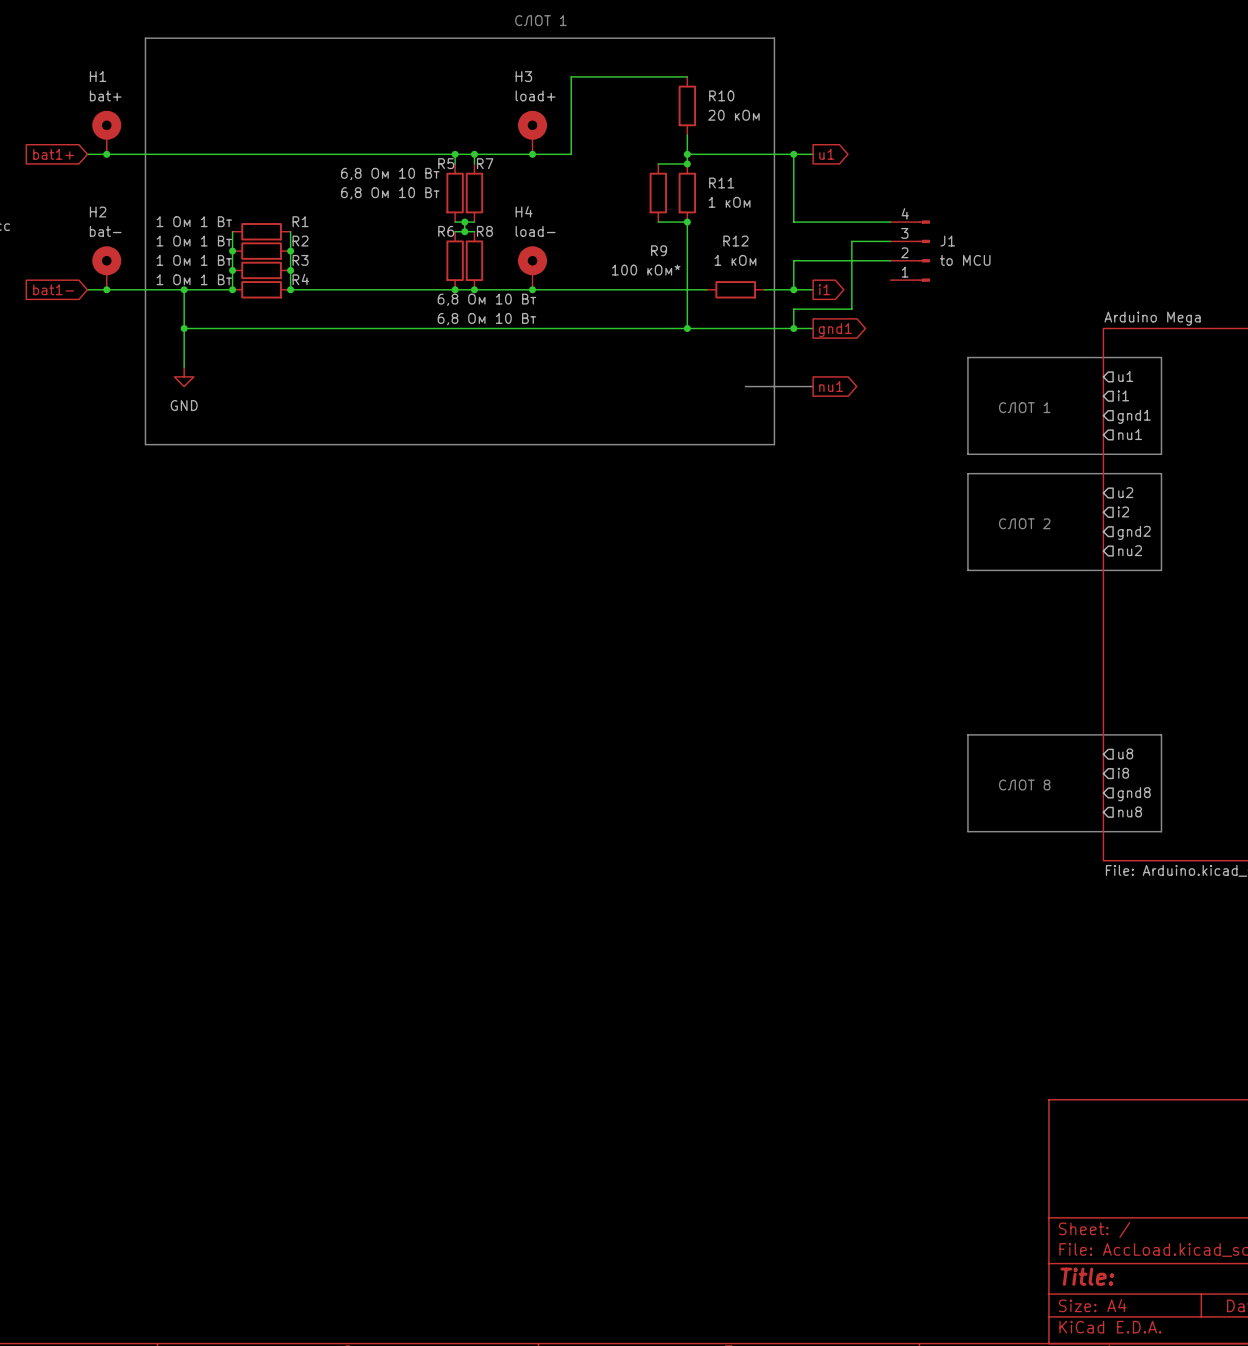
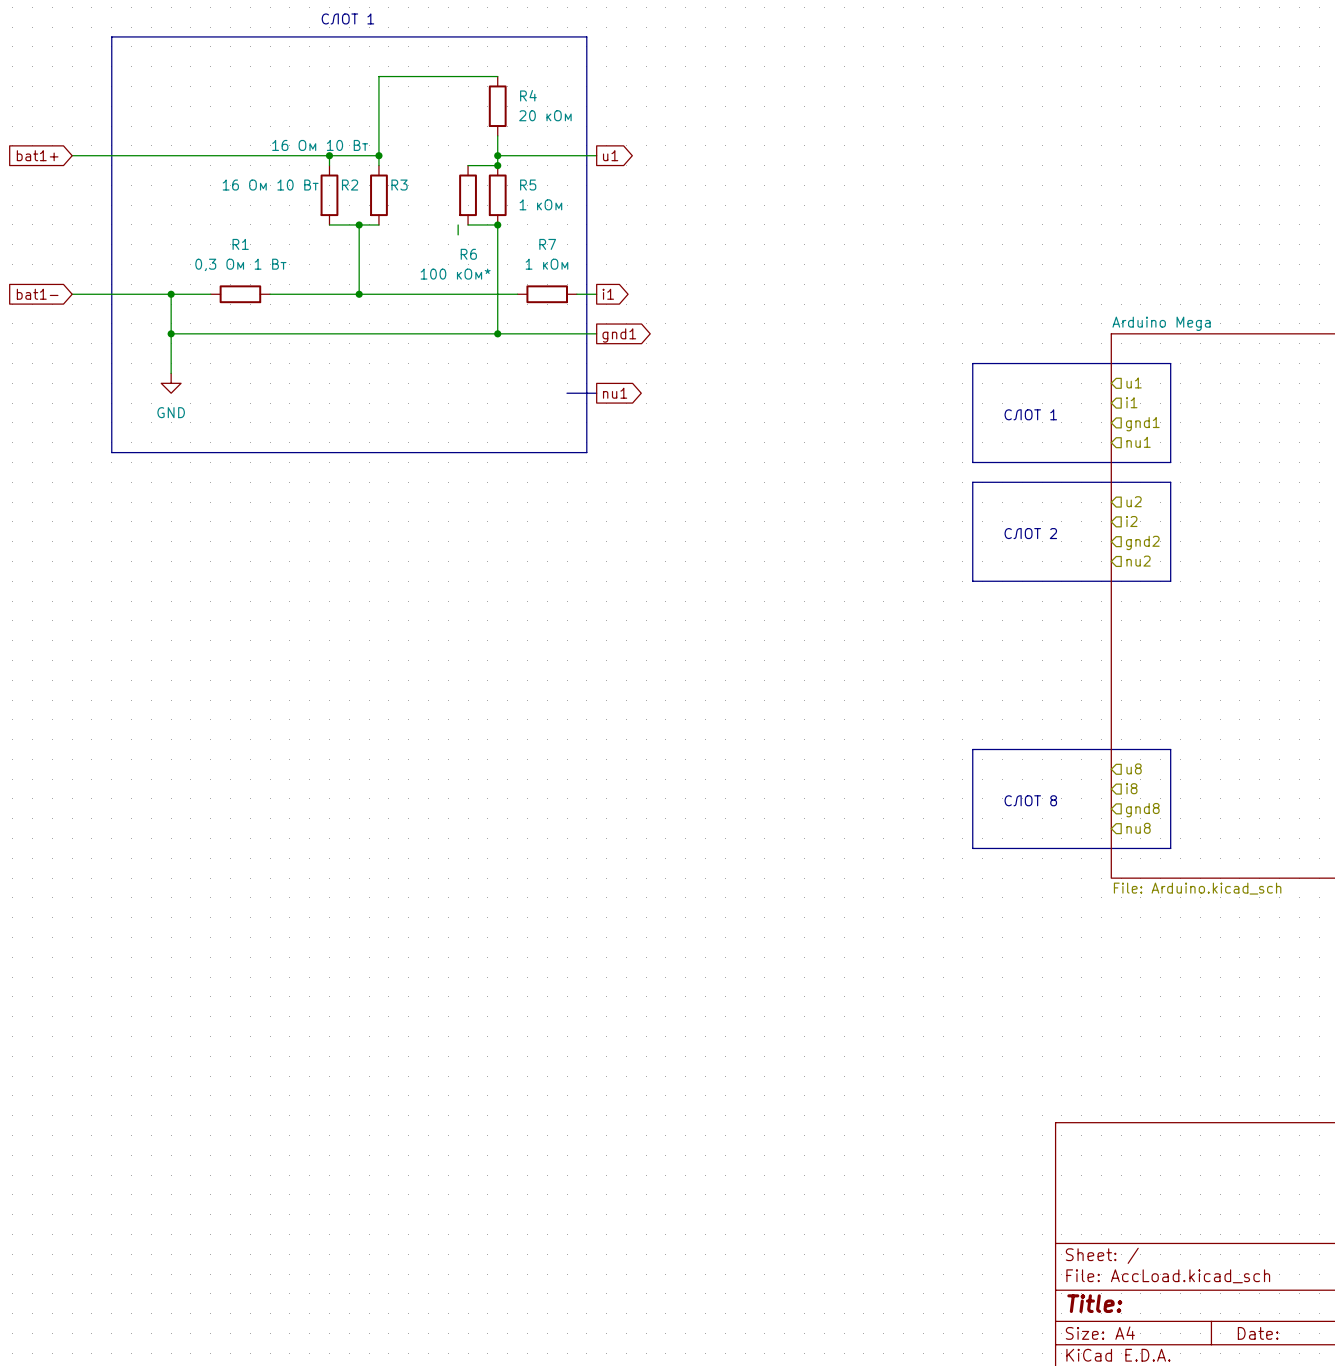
text position: СЛОТ 1 (540, 20) -> СЛОТ 1 (347, 18)
line: (145, 38) (145, 444) -> (131, 36) (111, 36) (111, 452) (131, 452)
line: (590, 38) (774, 38) (774, 444) (590, 444) -> (586, 36) (586, 452)
wire: none -> (497, 76) (378, 76) (378, 165)
wire: (687, 76) (571, 76) (571, 154) -> (596, 155) (567, 155)
R10: 20 кОм (687, 105) -> none
H1: bat+ (106, 132) -> none
H3: load+ (532, 132) -> none
wire: (687, 134) (687, 164) (658, 164) -> none
junction: (106, 154) -> none
junction: none -> (329, 155)
wire: (387, 154) (503, 154) -> none
junction: none -> (378, 155)
wire: (455, 154) (455, 164) -> (329, 155) (329, 165)
junction: (455, 154) -> none
wire: (474, 154) (474, 164) -> (497, 135) (497, 165) (468, 165)
junction: (474, 154) -> none
junction: none -> (497, 155)
junction: (532, 154) -> none
global label: none -> u1 (610, 155)
wire: (687, 154) (813, 154) -> none
junction: (687, 154) -> none
wire: (793, 154) (793, 222) (890, 222) -> none
junction: (793, 154) -> none
global label: u1 (826, 154) -> none
R5 name position: R5 (446, 163) -> R5 (528, 185)
R7 name: R7 (485, 163) -> R6 (468, 254)
junction: none -> (497, 165)
junction: (687, 164) -> none
R5 value: 6,8 Ом 10 Вт (390, 174) -> 1 кОм (540, 204)
R7 value: 6,8 Ом 10 Вт (390, 193) -> 100 кОм* (455, 274)
R5 position: (455, 193) -> (497, 195)
R9: 100 кОм* (658, 193) -> none
R11: 1 кОм (687, 193) -> none
R1 value: 1 Ом 1 Вт (194, 221) -> 0,3 Ом 1 Вт (240, 264)
R1 name position: R1 (300, 221) -> R1 (240, 244)
wire: none -> (329, 224) (378, 224)
wire: none -> (359, 224) (359, 294)
junction: none -> (359, 224)
wire: (455, 222) (474, 222) -> (497, 333) (497, 224) (468, 224)
junction: (464, 222) -> none
junction: none -> (497, 224)
wire: (658, 222) (687, 222) (687, 328) -> none
junction: (687, 222) -> none
wire: (232, 231) (232, 289) (222, 289) -> none
R1 position: (261, 231) -> (240, 294)
wire: (455, 231) (474, 231) -> none
junction: (464, 231) -> none
R2 value: 1 Ом 1 Вт (194, 241) -> 16 Ом 10 Вт (270, 185)
R2 name position: R2 (300, 241) -> R2 (350, 185)
wire: (890, 241) (851, 241) (851, 309) (793, 309) (793, 328) -> none
junction: (232, 251) -> none
R2 rotation: 0° (261, 251) -> 90° clockwise (329, 195)
R2 position: (261, 251) -> (329, 195)
junction: (290, 251) -> none
J1: to MCU (910, 251) -> none
R3 value: 1 Ом 1 Вт (194, 260) -> 16 Ом 10 Вт (320, 145)
R3 name position: R3 (300, 260) -> R3 (399, 185)
R6: 6,8 Ом 10 Вт (455, 260) -> none
R8: 6,8 Ом 10 Вт (474, 260) -> none
wire: (890, 260) (793, 260) (793, 289) -> none
H2: bat- (106, 268) -> none
H4: load- (532, 268) -> none
junction: (232, 270) -> none
R3 rotation: 0° (261, 270) -> 90° clockwise (378, 195)
R3 position: (261, 270) -> (378, 195)
junction: (290, 270) -> none
R4 value: 1 Ом 1 Вт (194, 279) -> 20 кОм (545, 115)
junction: (106, 289) -> none
junction: (232, 289) -> none
R4 rotation: 0° (261, 289) -> 90° clockwise (497, 106)
R4 position: (261, 289) -> (497, 106)
junction: (290, 289) -> none
junction: none -> (359, 294)
junction: (455, 289) -> none
junction: (474, 289) -> none
wire: (522, 289) (580, 289) -> none
junction: (532, 289) -> none
R7: none -> 1 кОм (547, 294)
wire: (600, 289) (706, 289) -> none
global label: none -> i1 (608, 294)
R12: 1 кОм (735, 289) -> none
wire: (764, 289) (813, 289) -> none
junction: (793, 289) -> none
global label: i1 (824, 289) -> none
junction: none -> (497, 333)
wire: (600, 328) (813, 328) -> none
junction: (687, 328) -> none
junction: (793, 328) -> none
global label: none -> gnd1 (619, 335)
global label: gnd1 (835, 330) -> none
line: none -> (567, 393) (596, 393)
global label: none -> nu1 (615, 393)
line: (745, 386) (813, 386) -> none
global label: nu1 (831, 386) -> none

